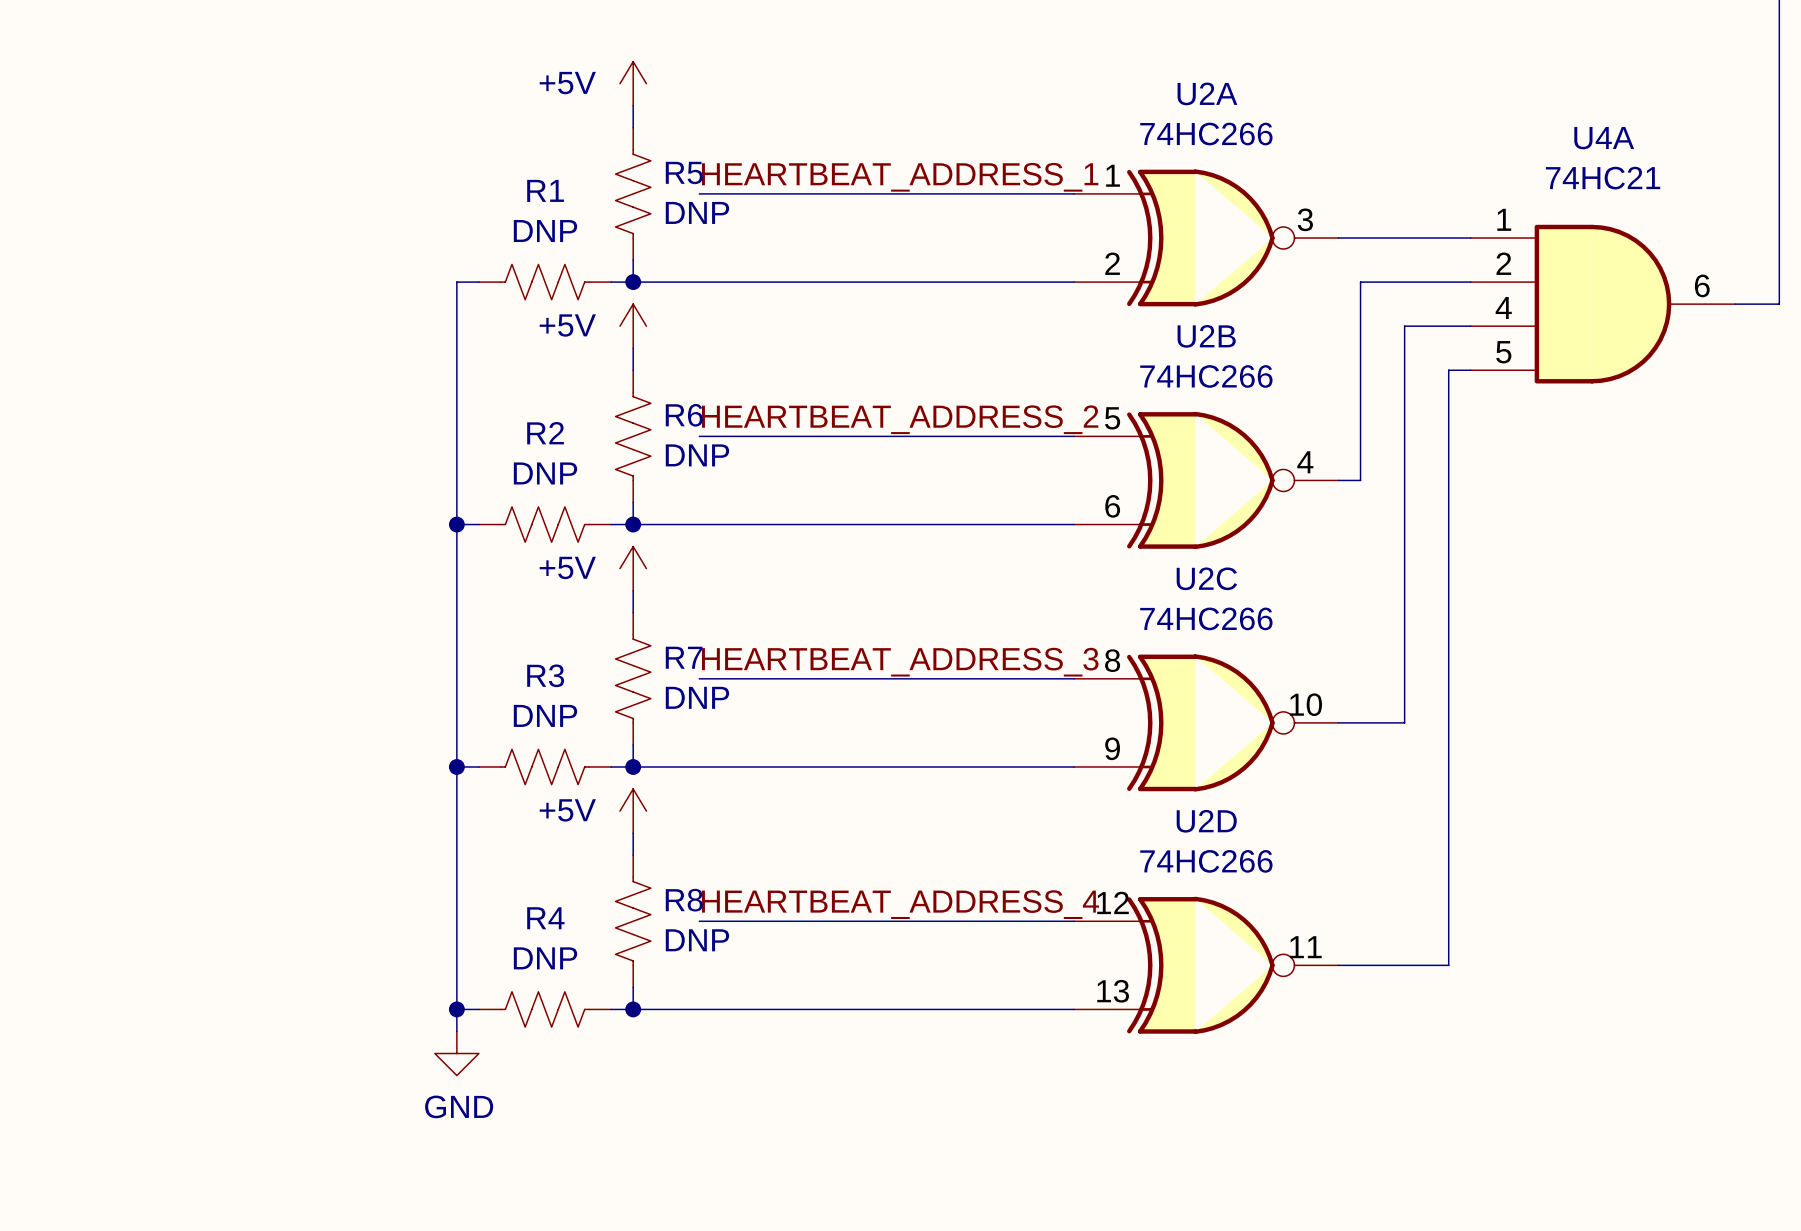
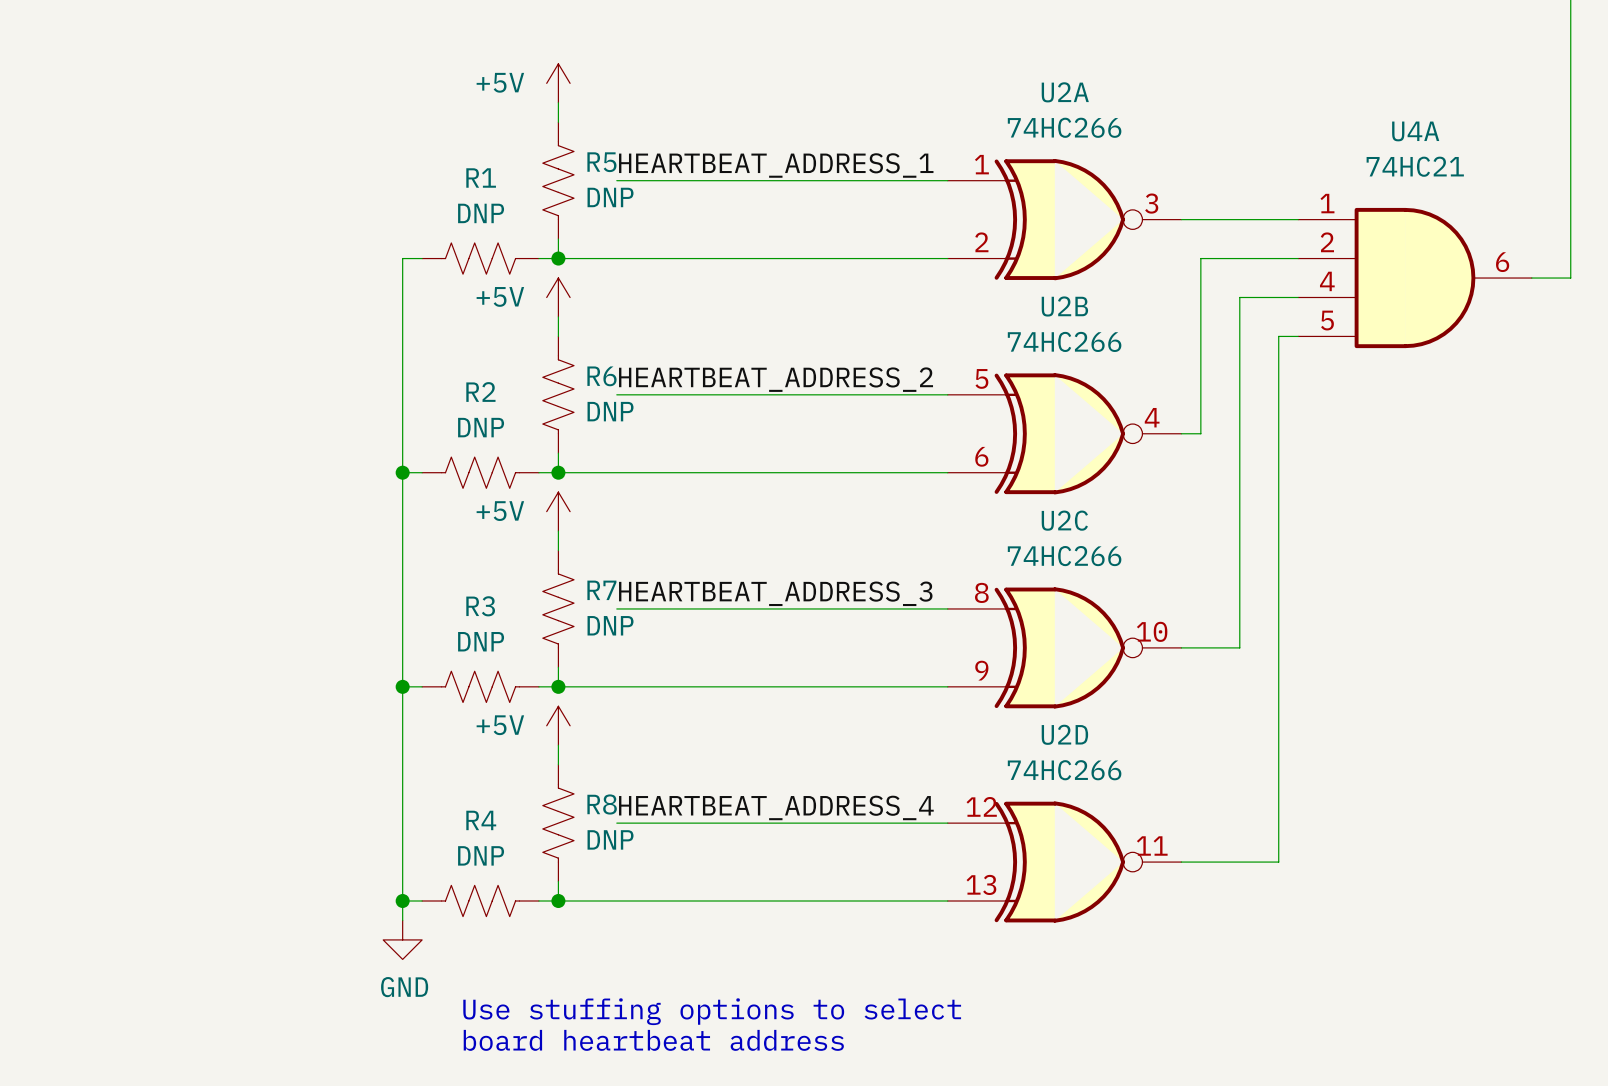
text: none -> Use stuffing options to select (712, 1011)
text: none -> board heartbeat address (653, 1040)

